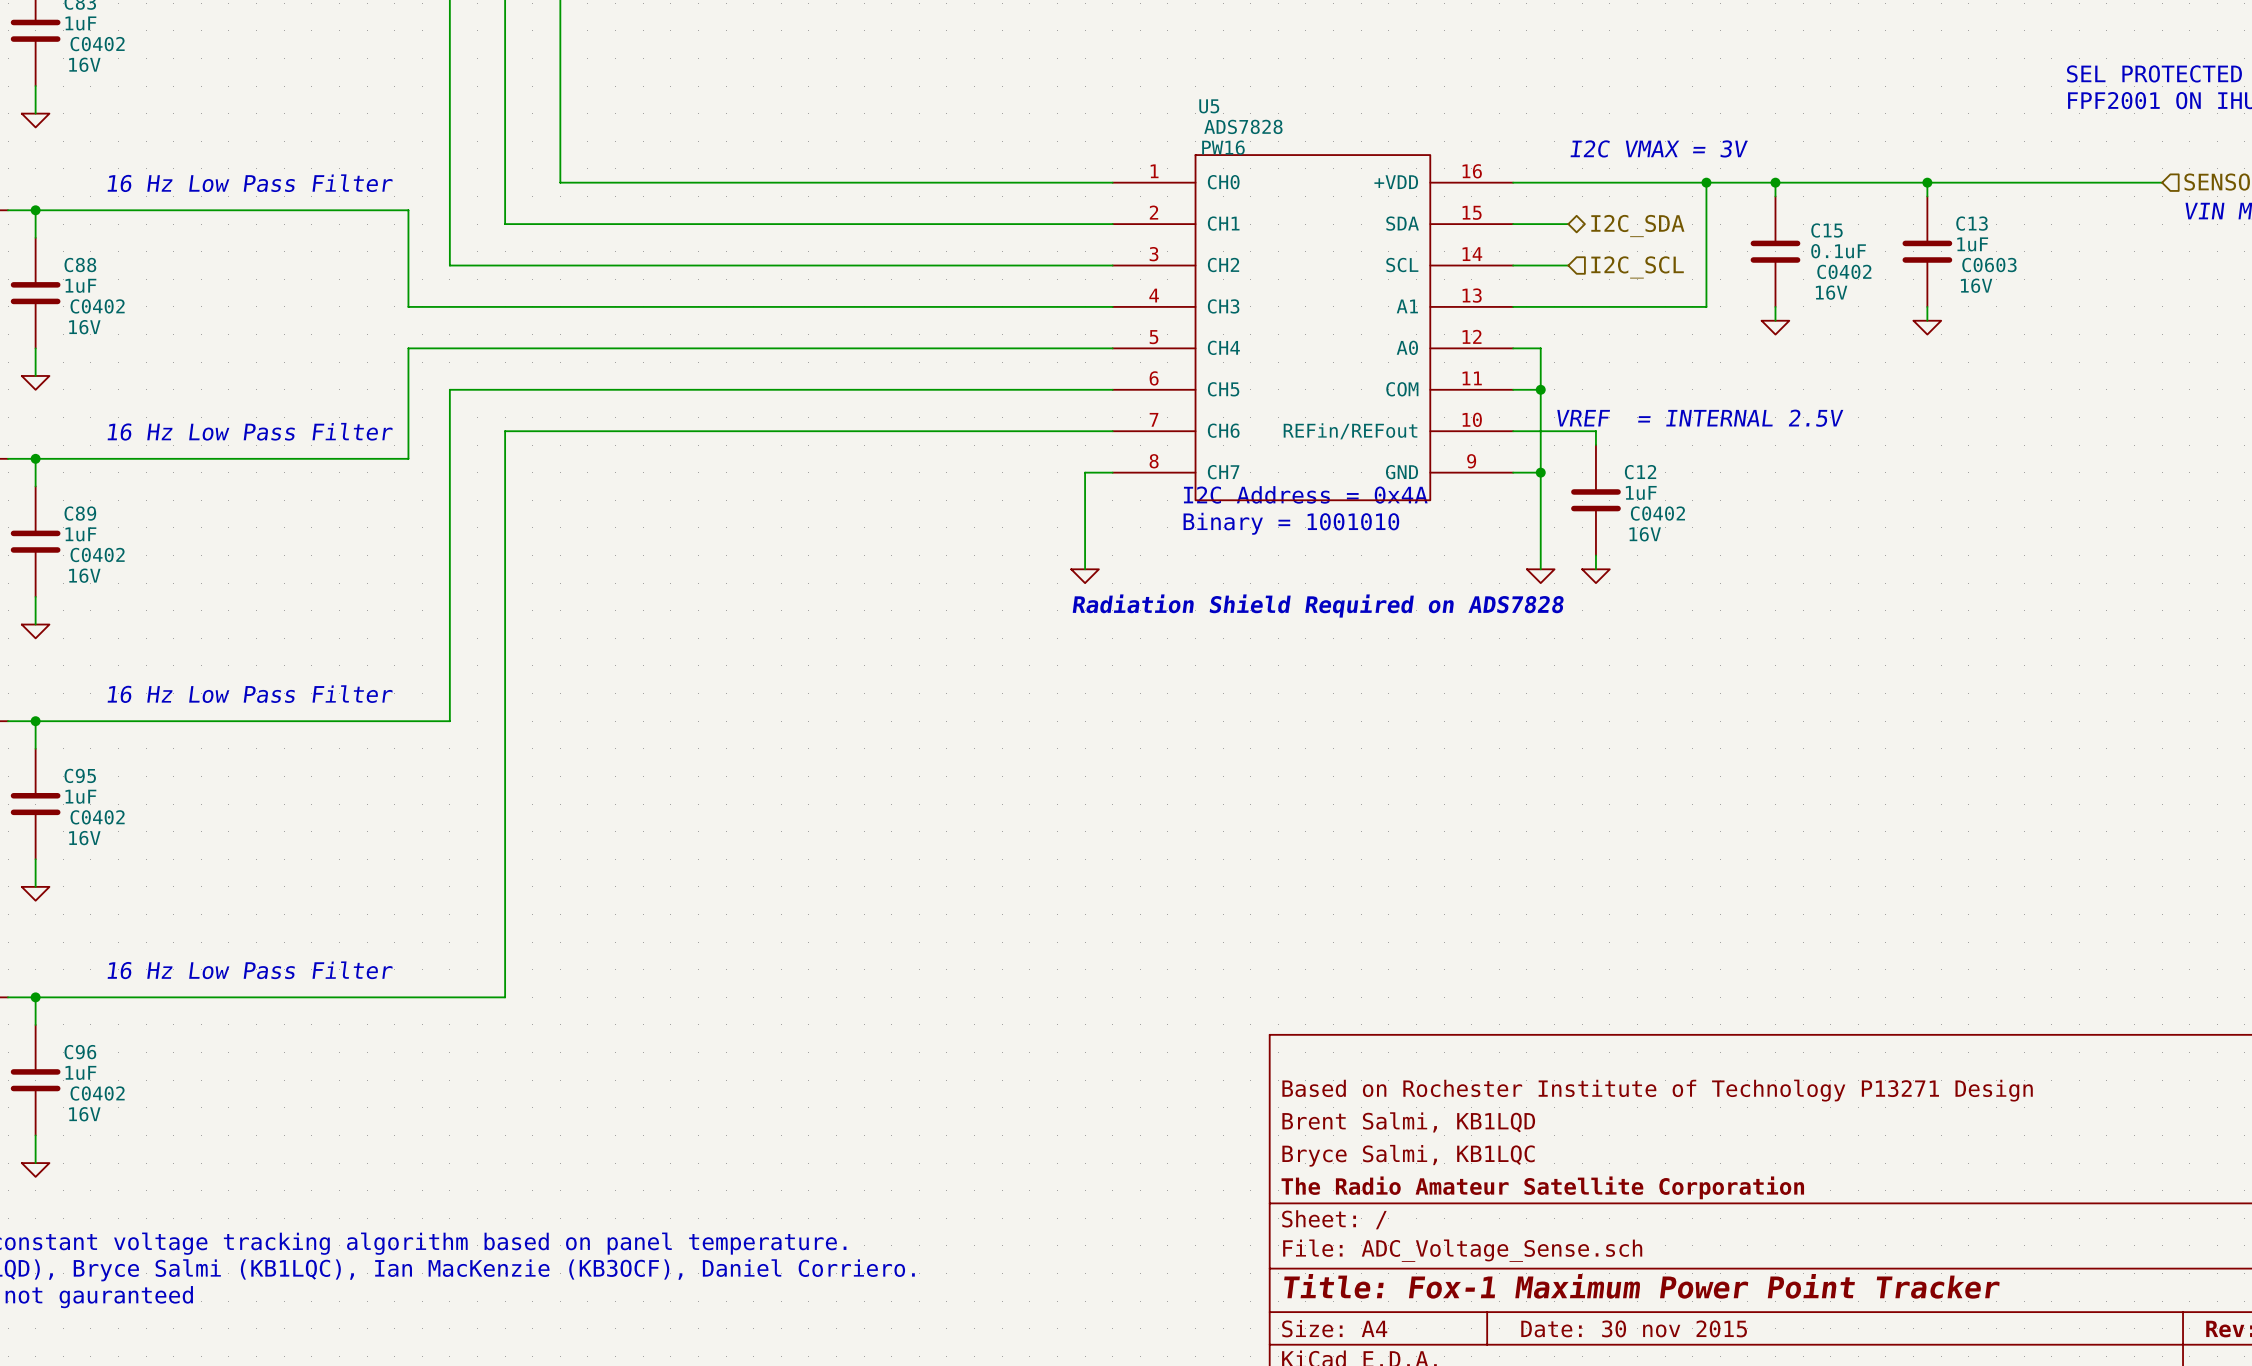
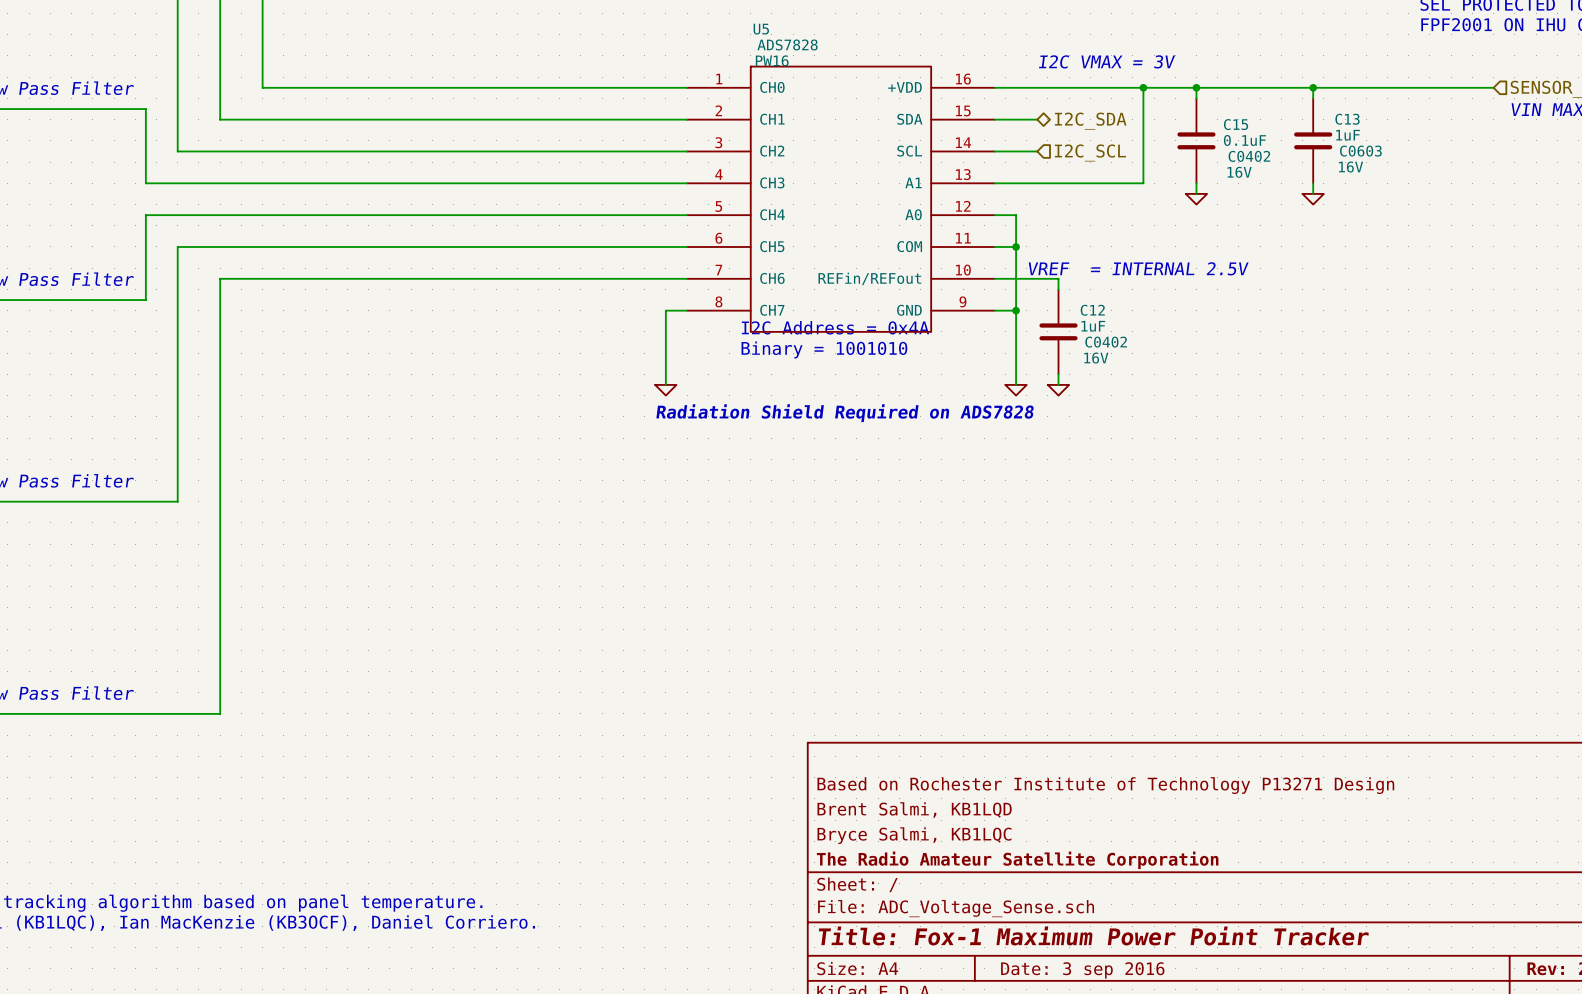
title block: Date: 30 nov 2015 (1634, 1328) -> Date: 3 sep 2016 (1082, 970)

